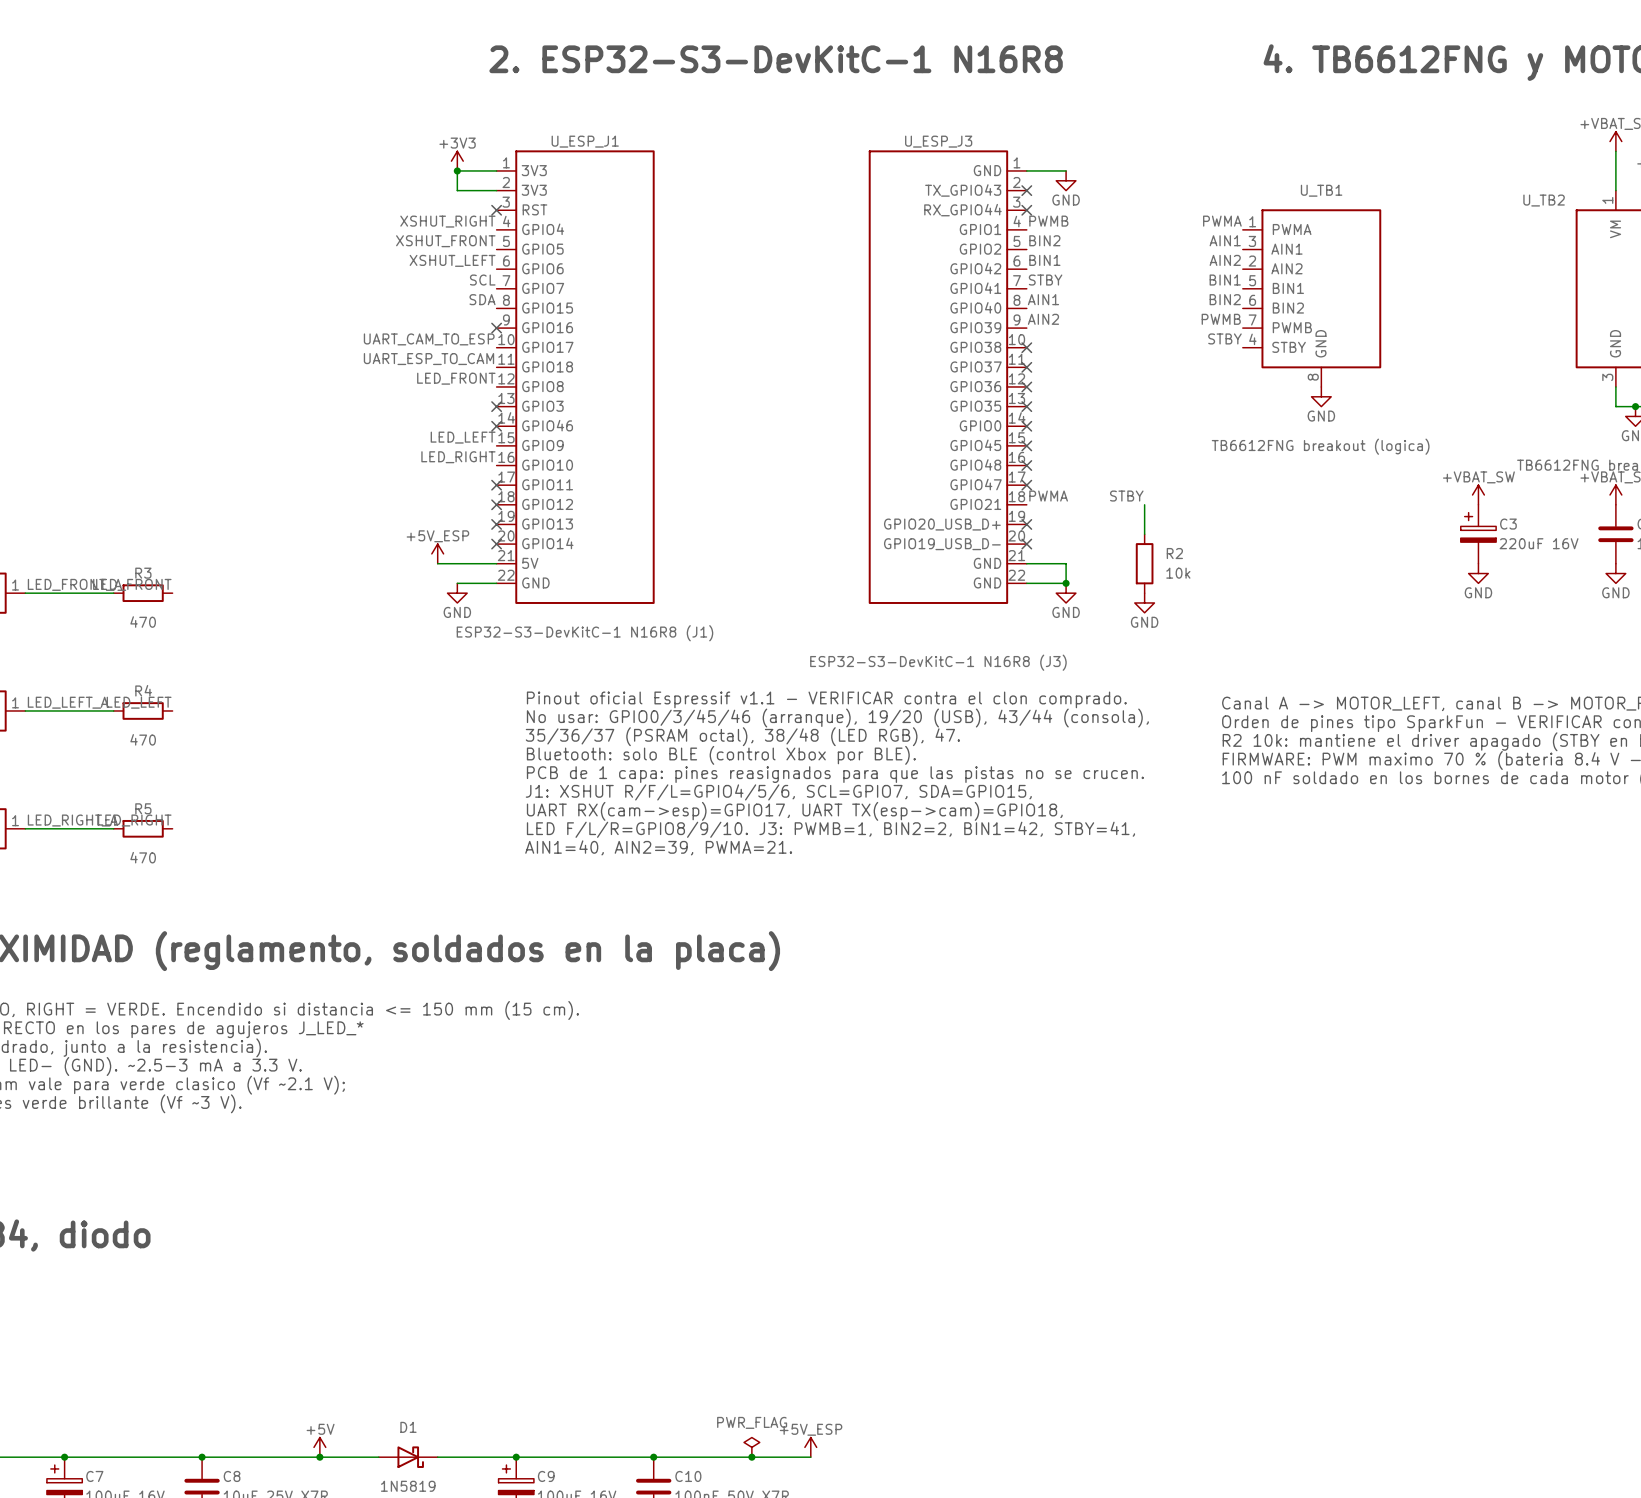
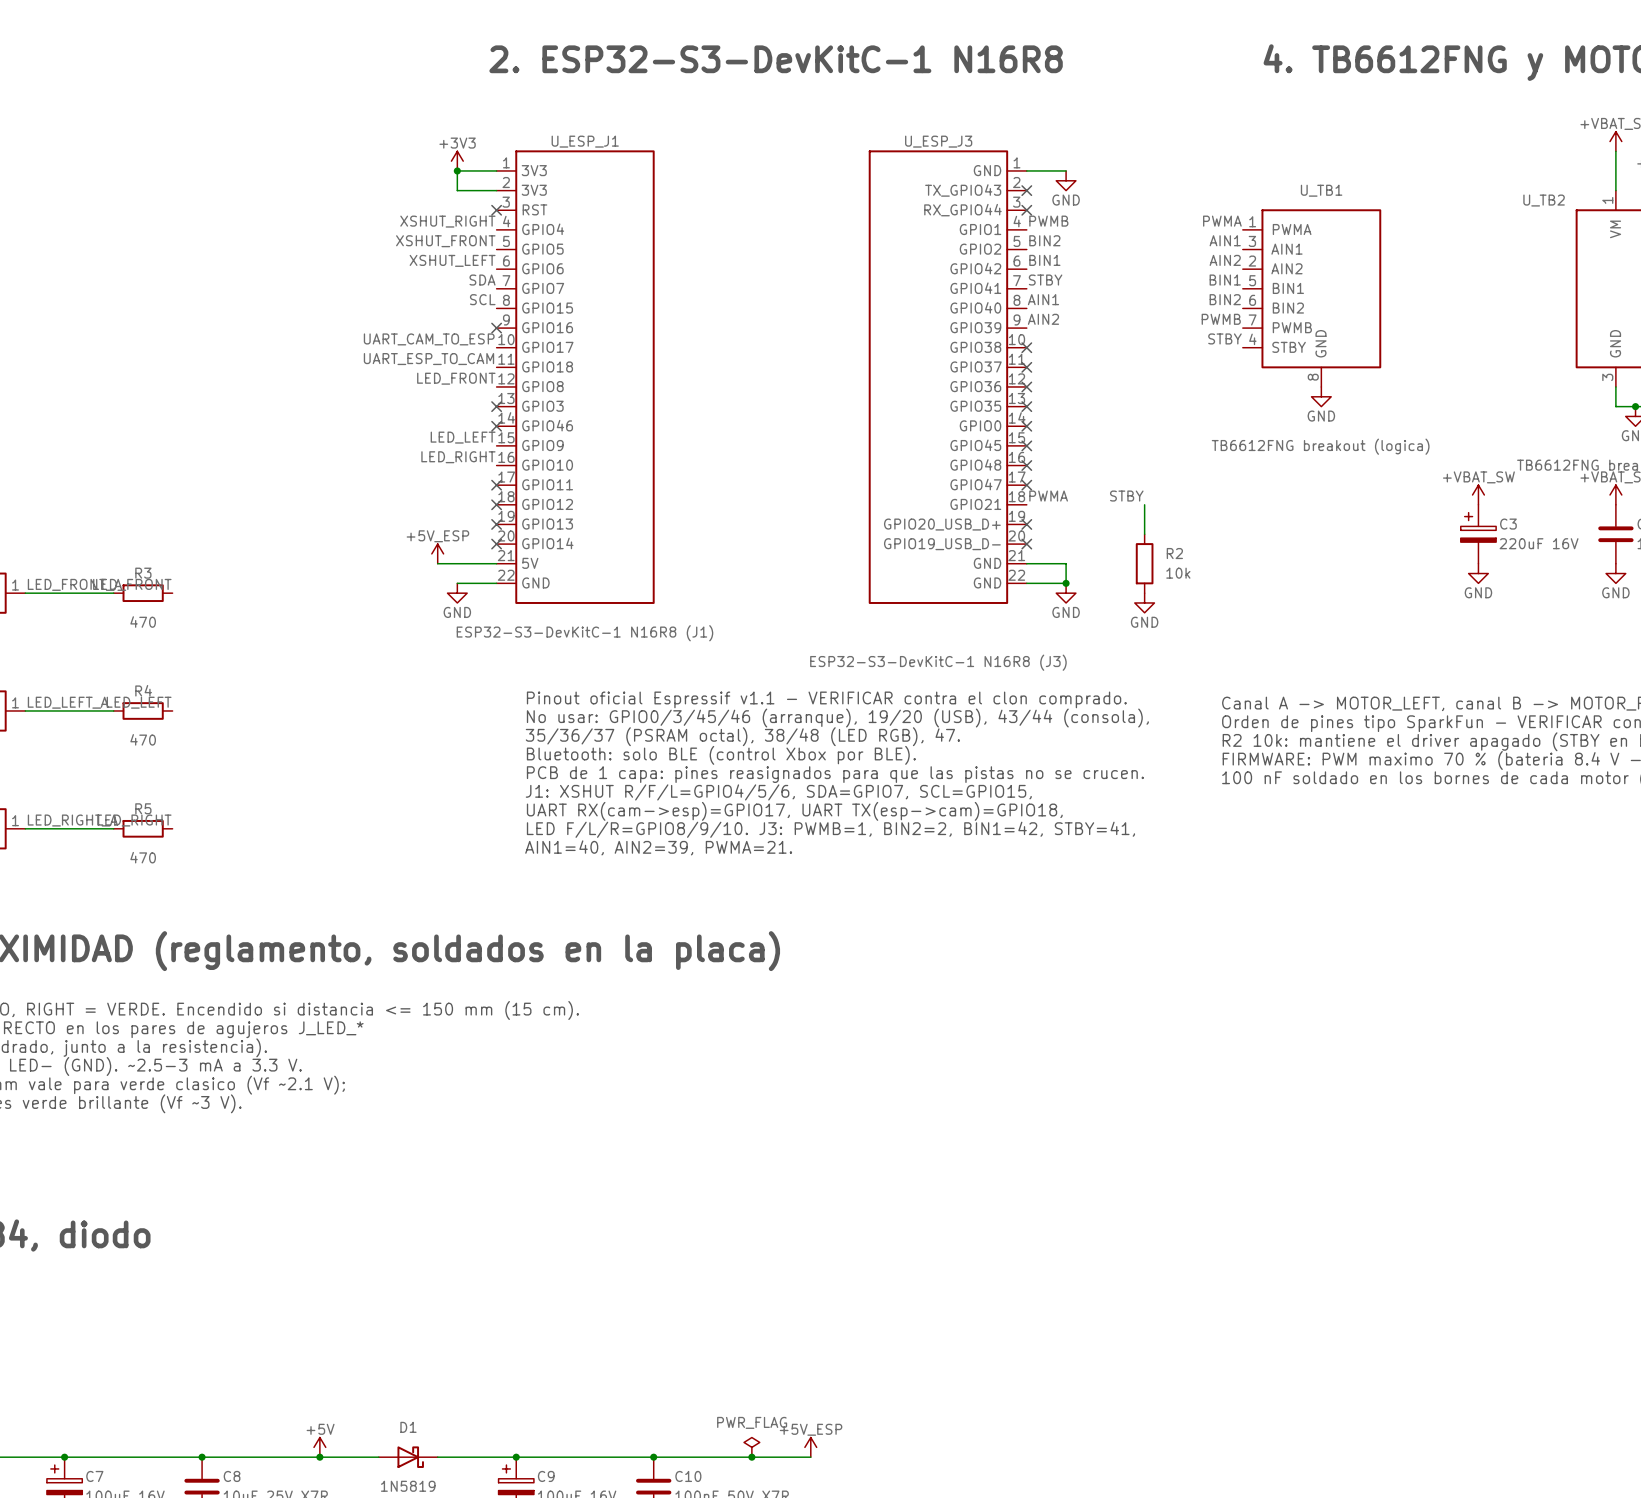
label: SCL (482, 280) -> SDA (482, 280)
label: SDA (482, 299) -> SCL (482, 299)
text: J1: XSHUT R/F/L=GPIO4/5/6, SCL=GPIO7, SDA=GPIO15, (778, 792) -> J1: XSHUT R/F/L=GPIO4/5/6, SDA=GPIO7, SCL=GPIO15, (778, 792)

